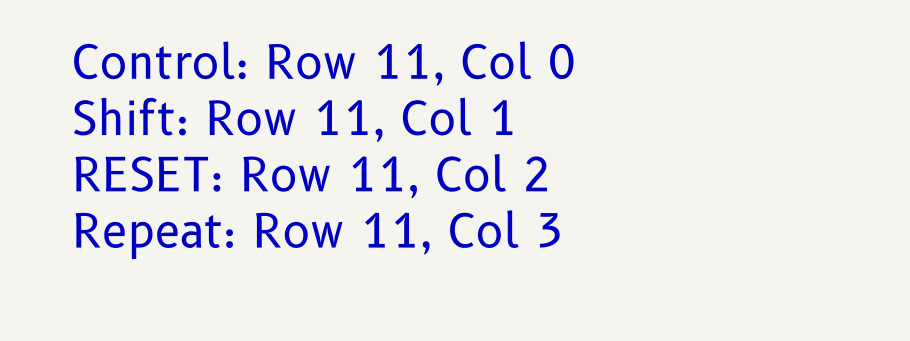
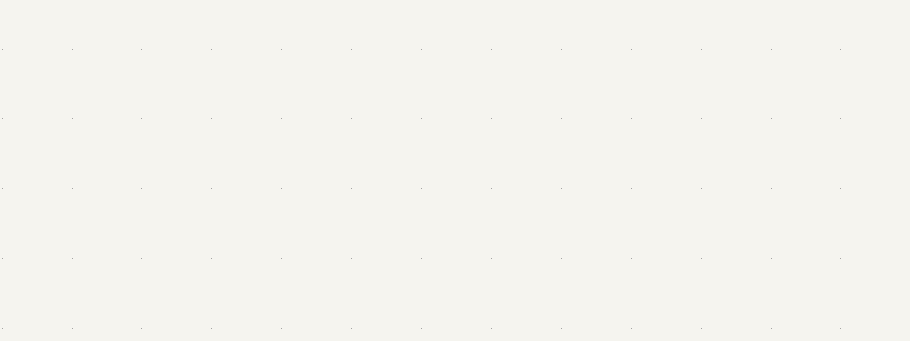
text: Control: Row 11, Col 0 (323, 63) -> none
text: Shift: Row 11, Col 1 (293, 119) -> none
text: RESET: Row 11, Col 2 (311, 176) -> none
text: Repeat: Row 11, Col 3 (317, 234) -> none

